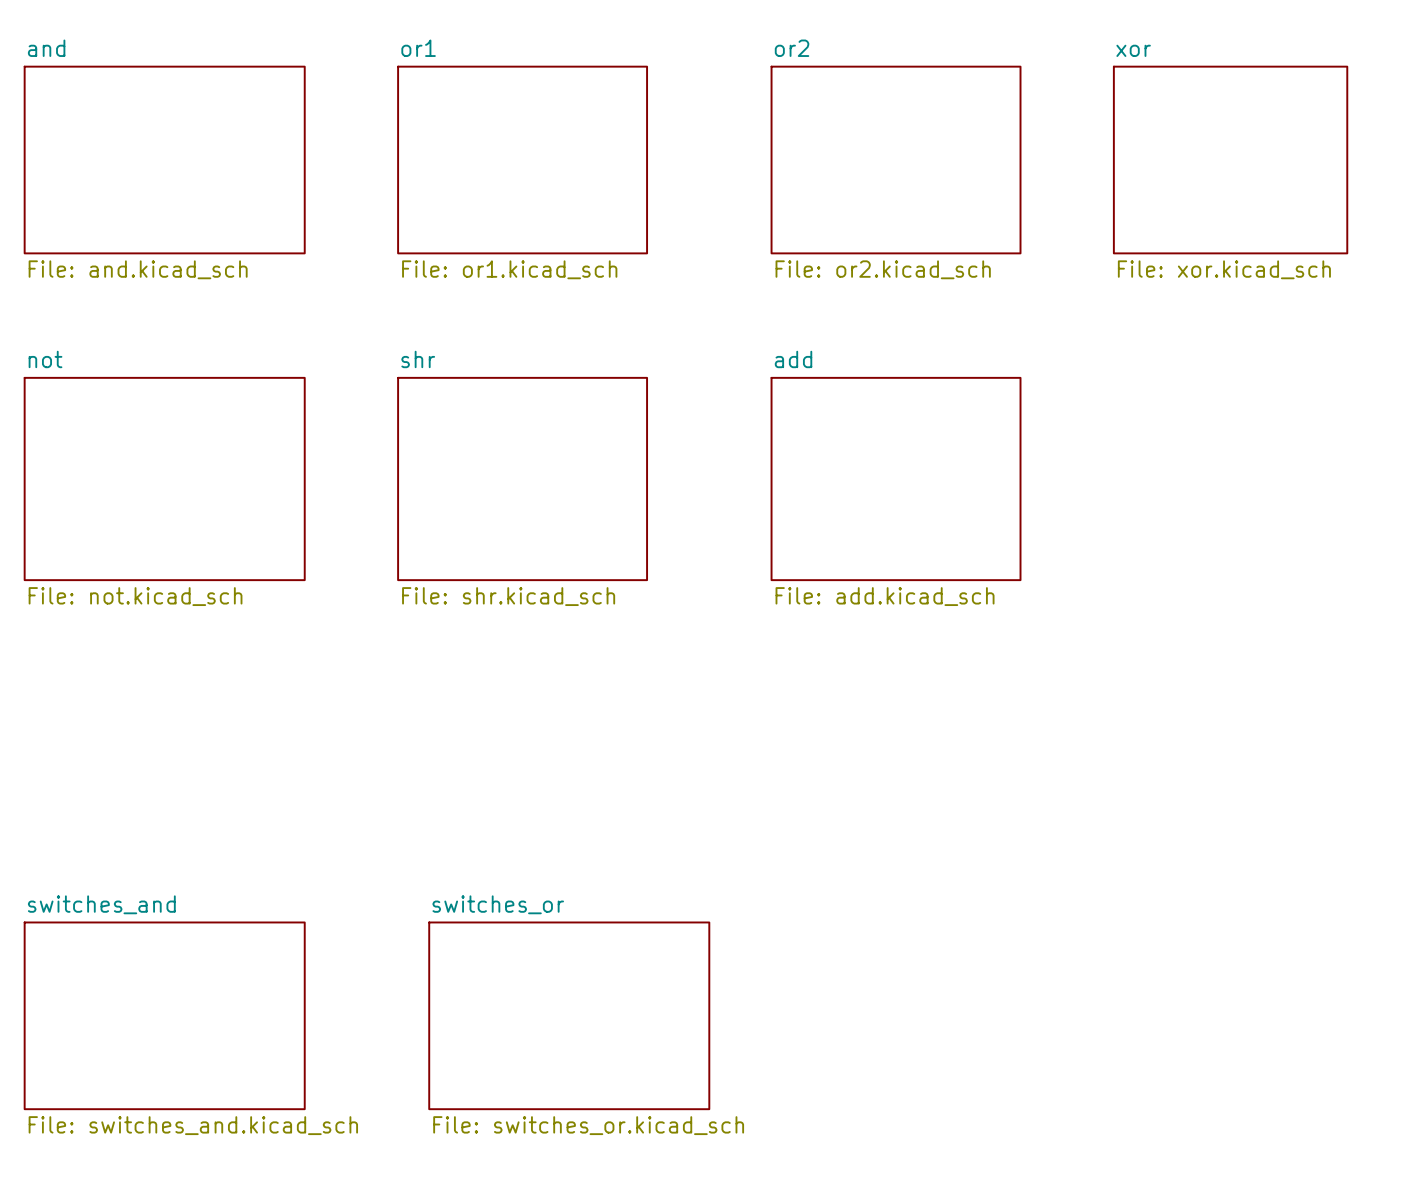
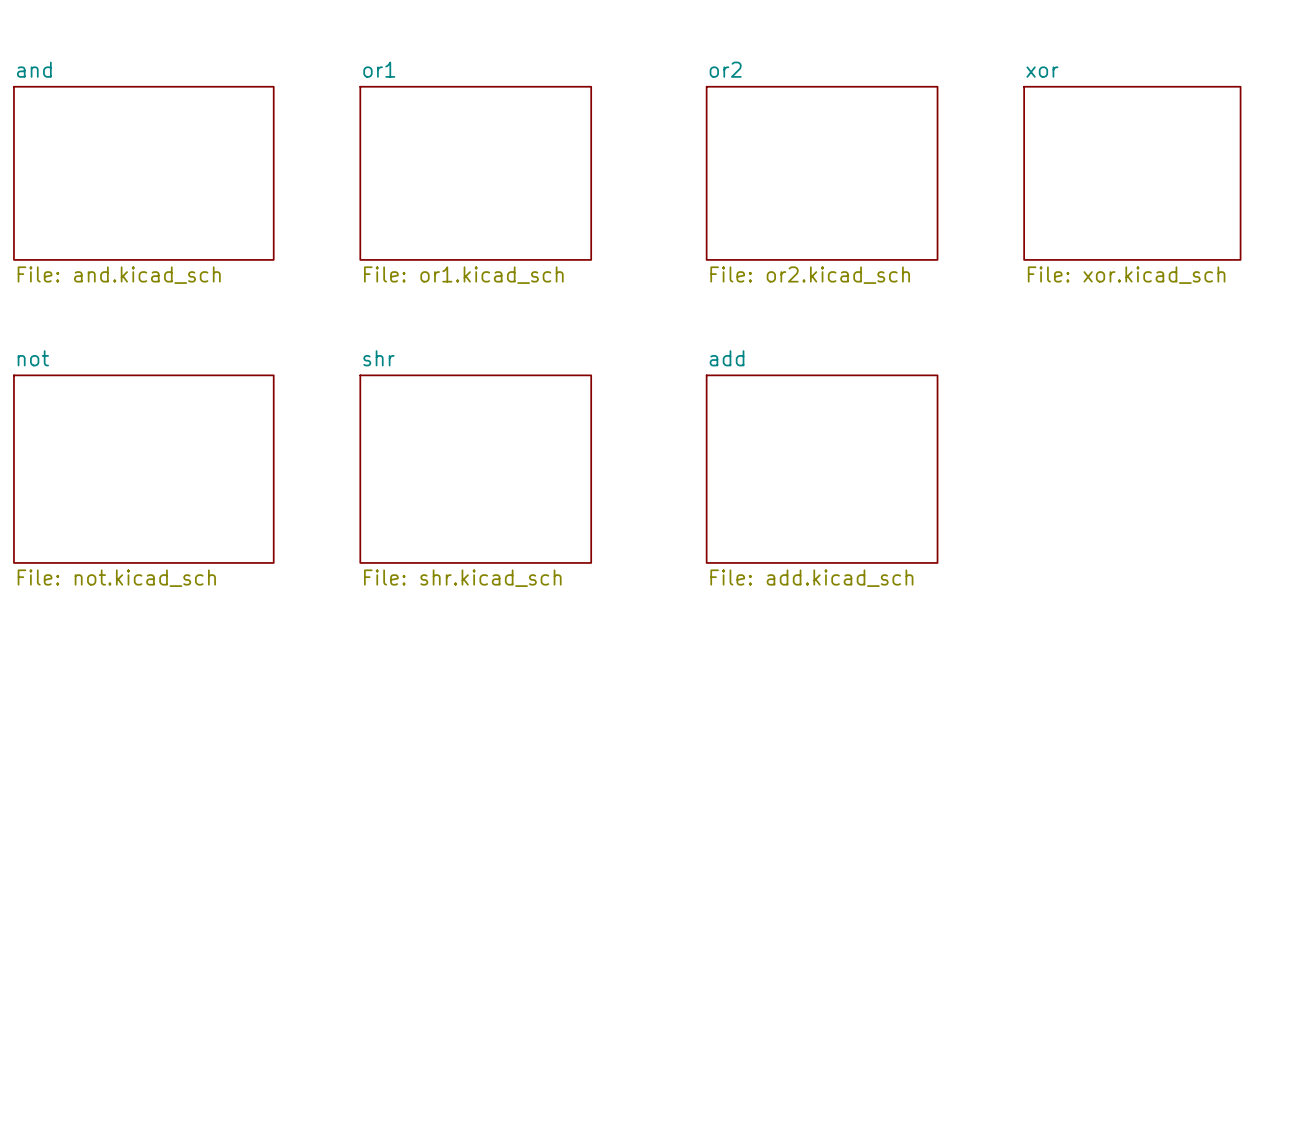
sheet switches_and: File: switches_and.kicad_sch (164, 1015) -> none
sheet switches_or: File: switches_or.kicad_sch (569, 1015) -> none

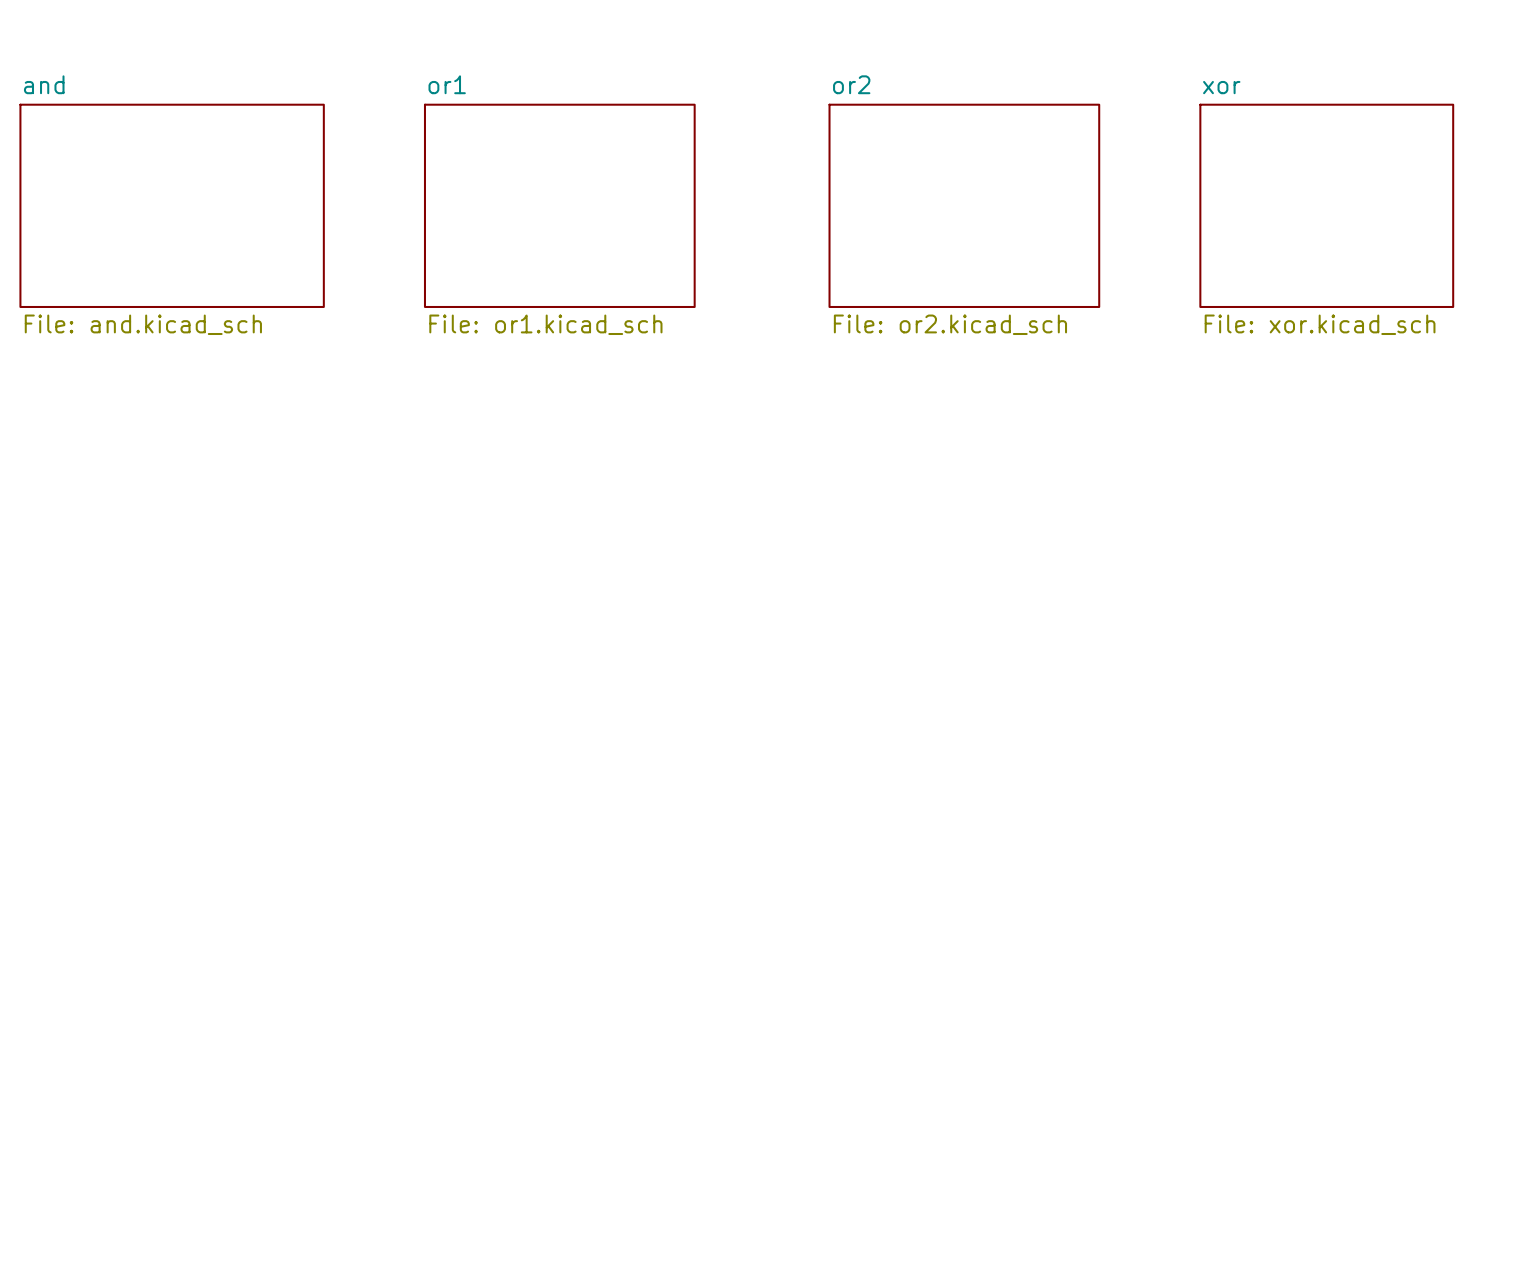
sheet not: File: not.kicad_sch (143, 469) -> none
sheet shr: File: shr.kicad_sch (475, 469) -> none
sheet add: File: add.kicad_sch (822, 469) -> none

